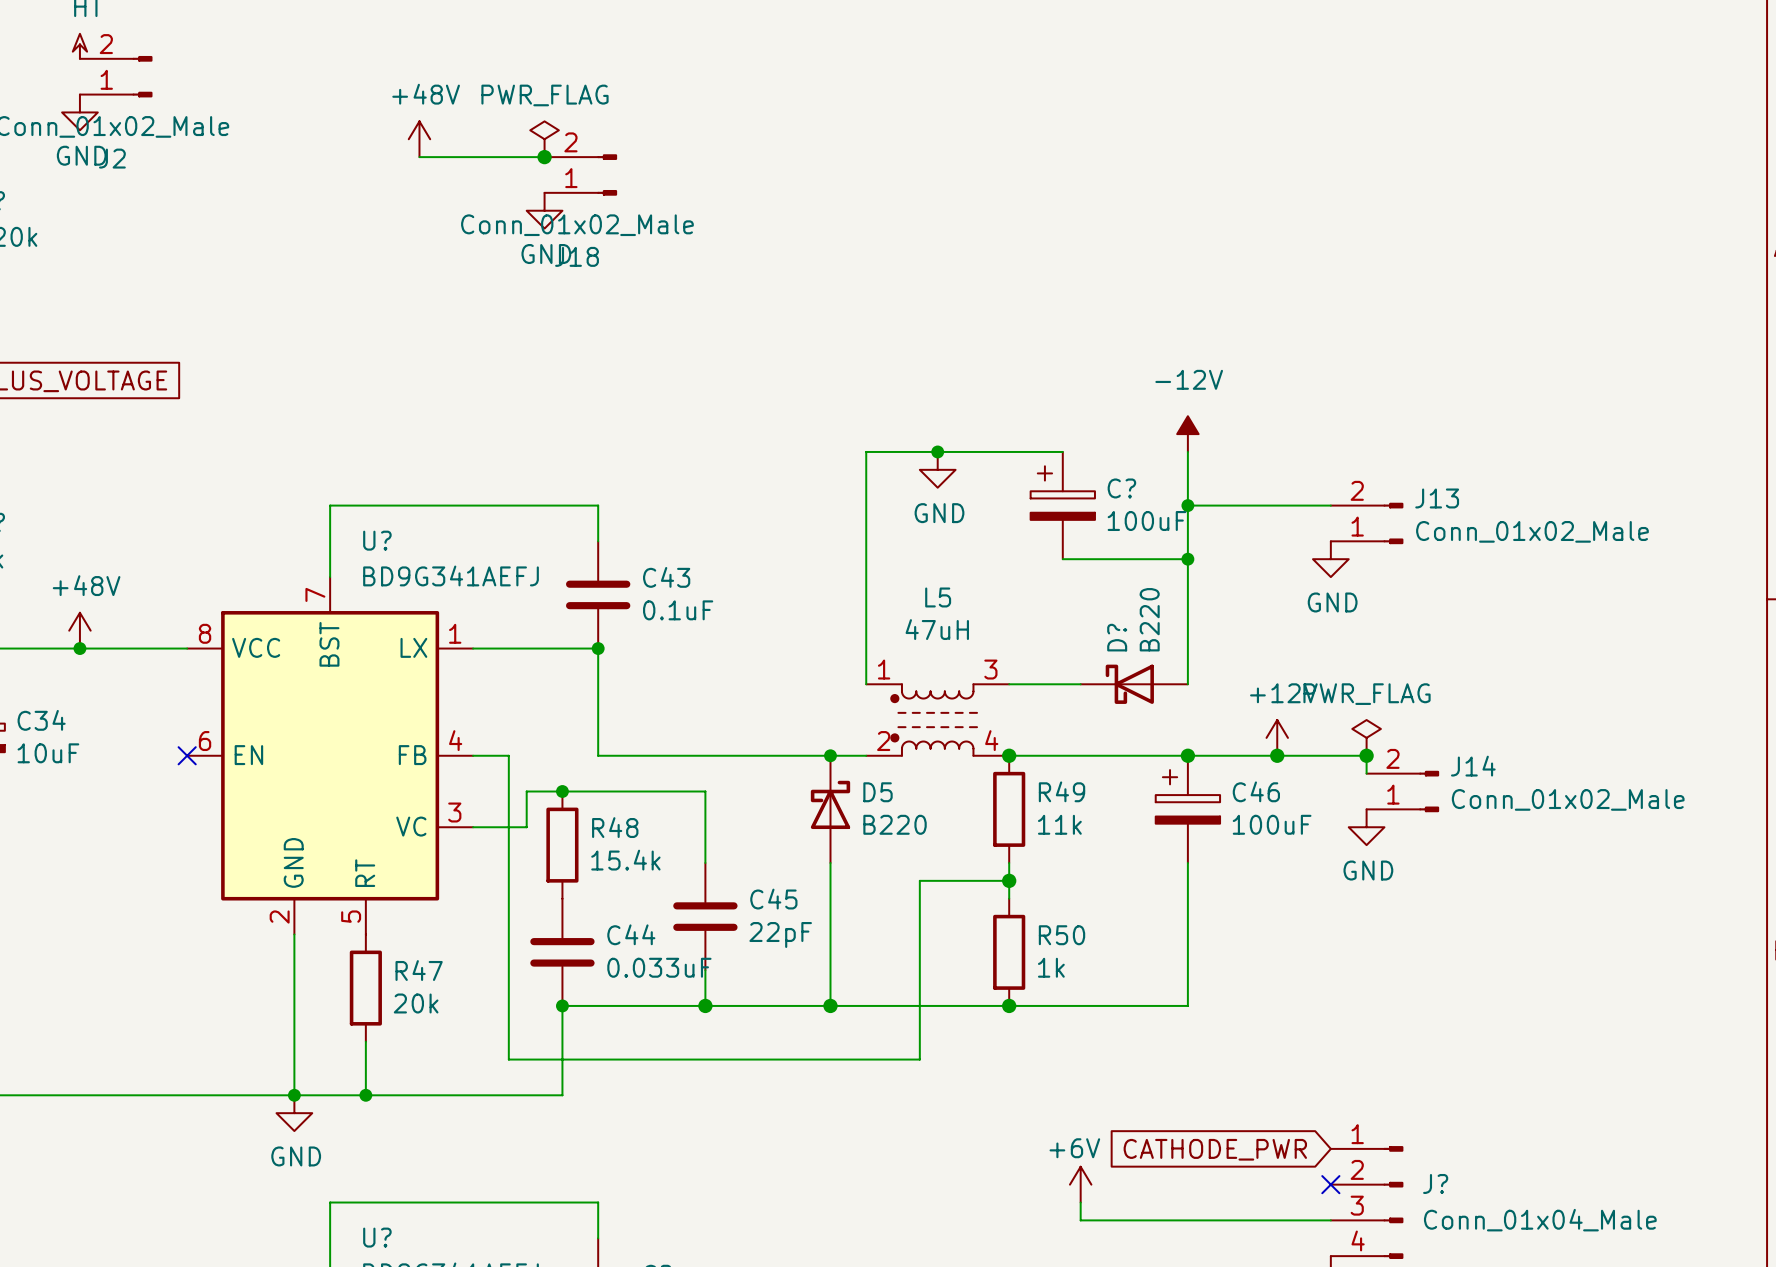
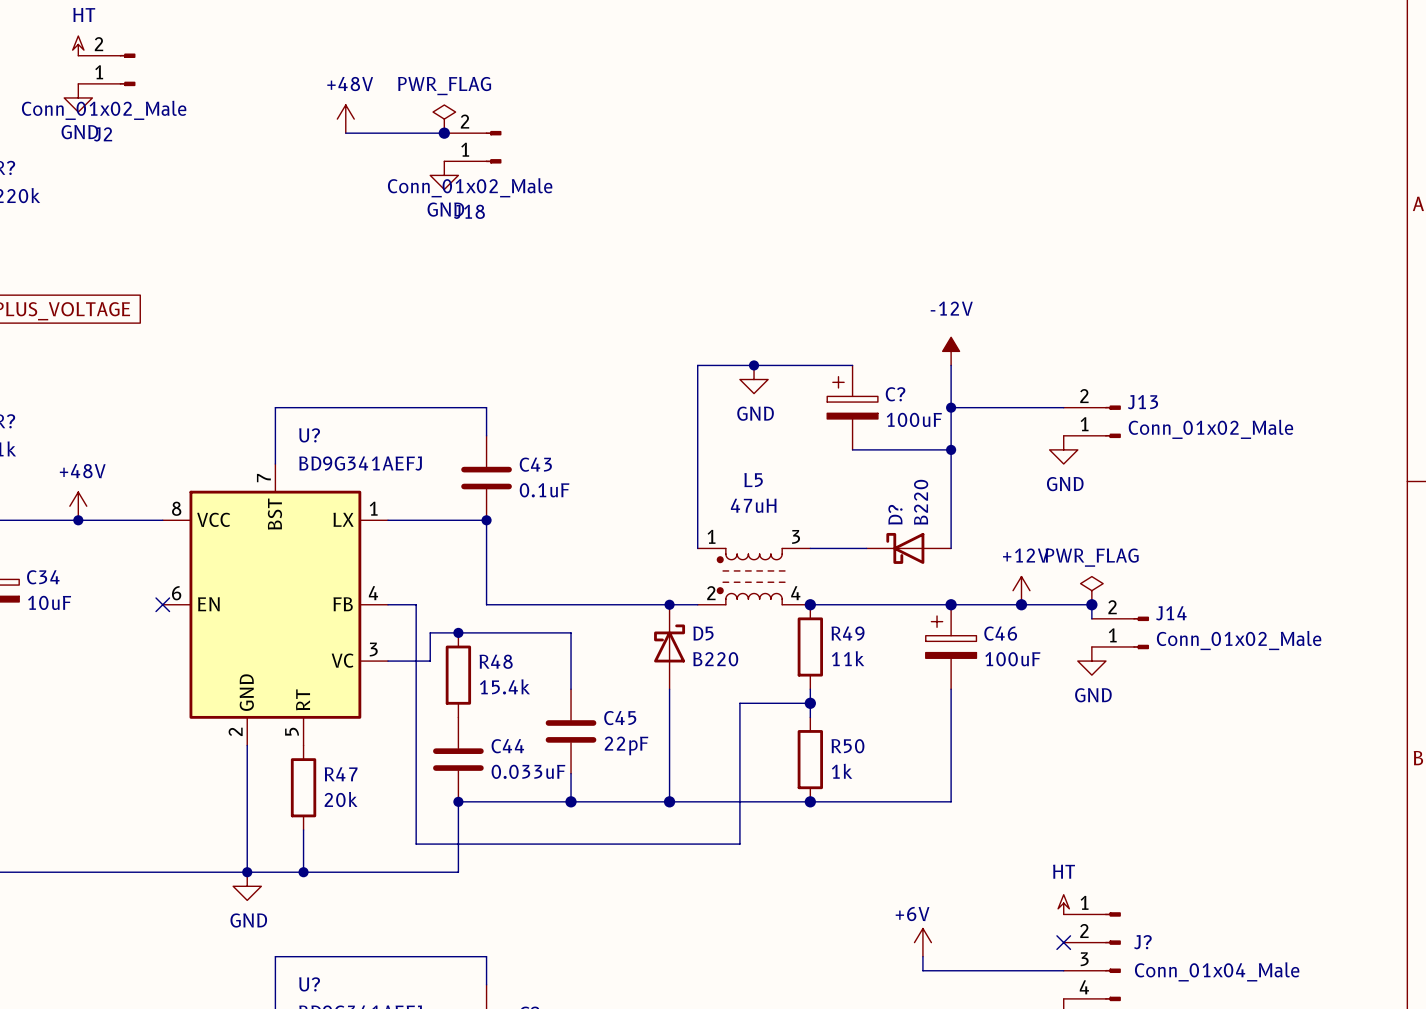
power symbol: none -> HT (1063, 904)
global label: CATHODE_PWR (1215, 1149) -> none
power symbol position: +6V (1080, 1184) -> +6V (922, 942)
wire: (1080, 1202) (1080, 1220) (1152, 1220) -> (922, 956) (922, 970)

